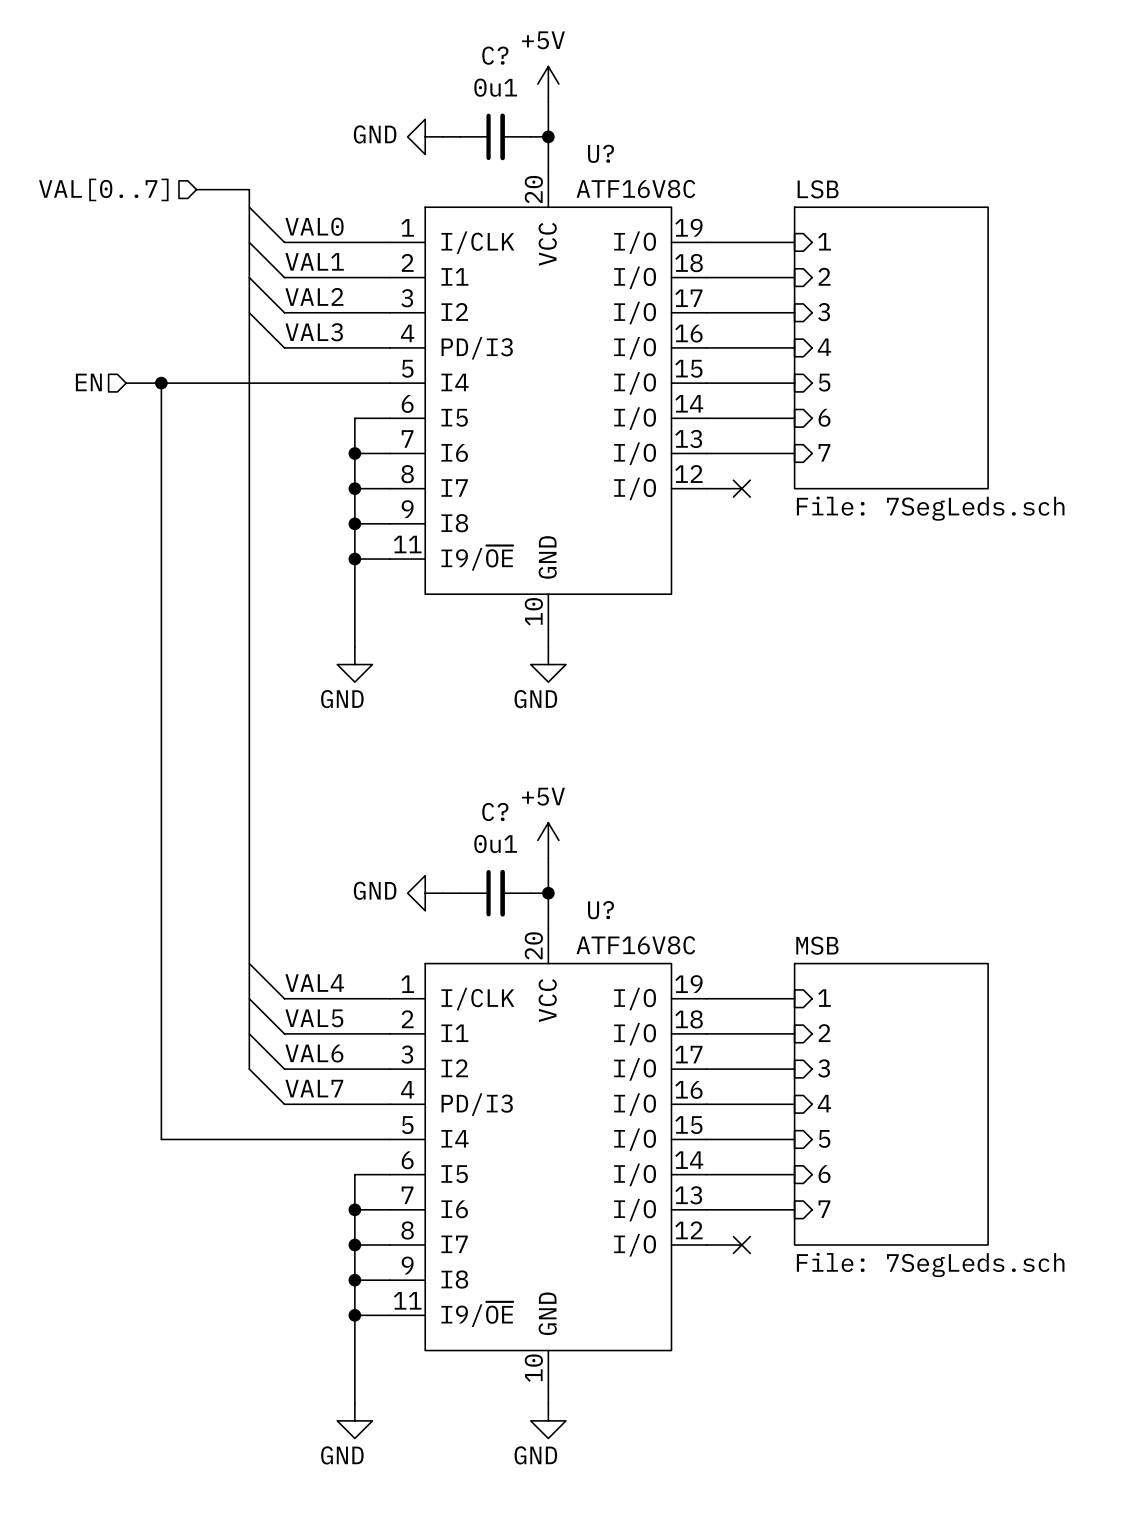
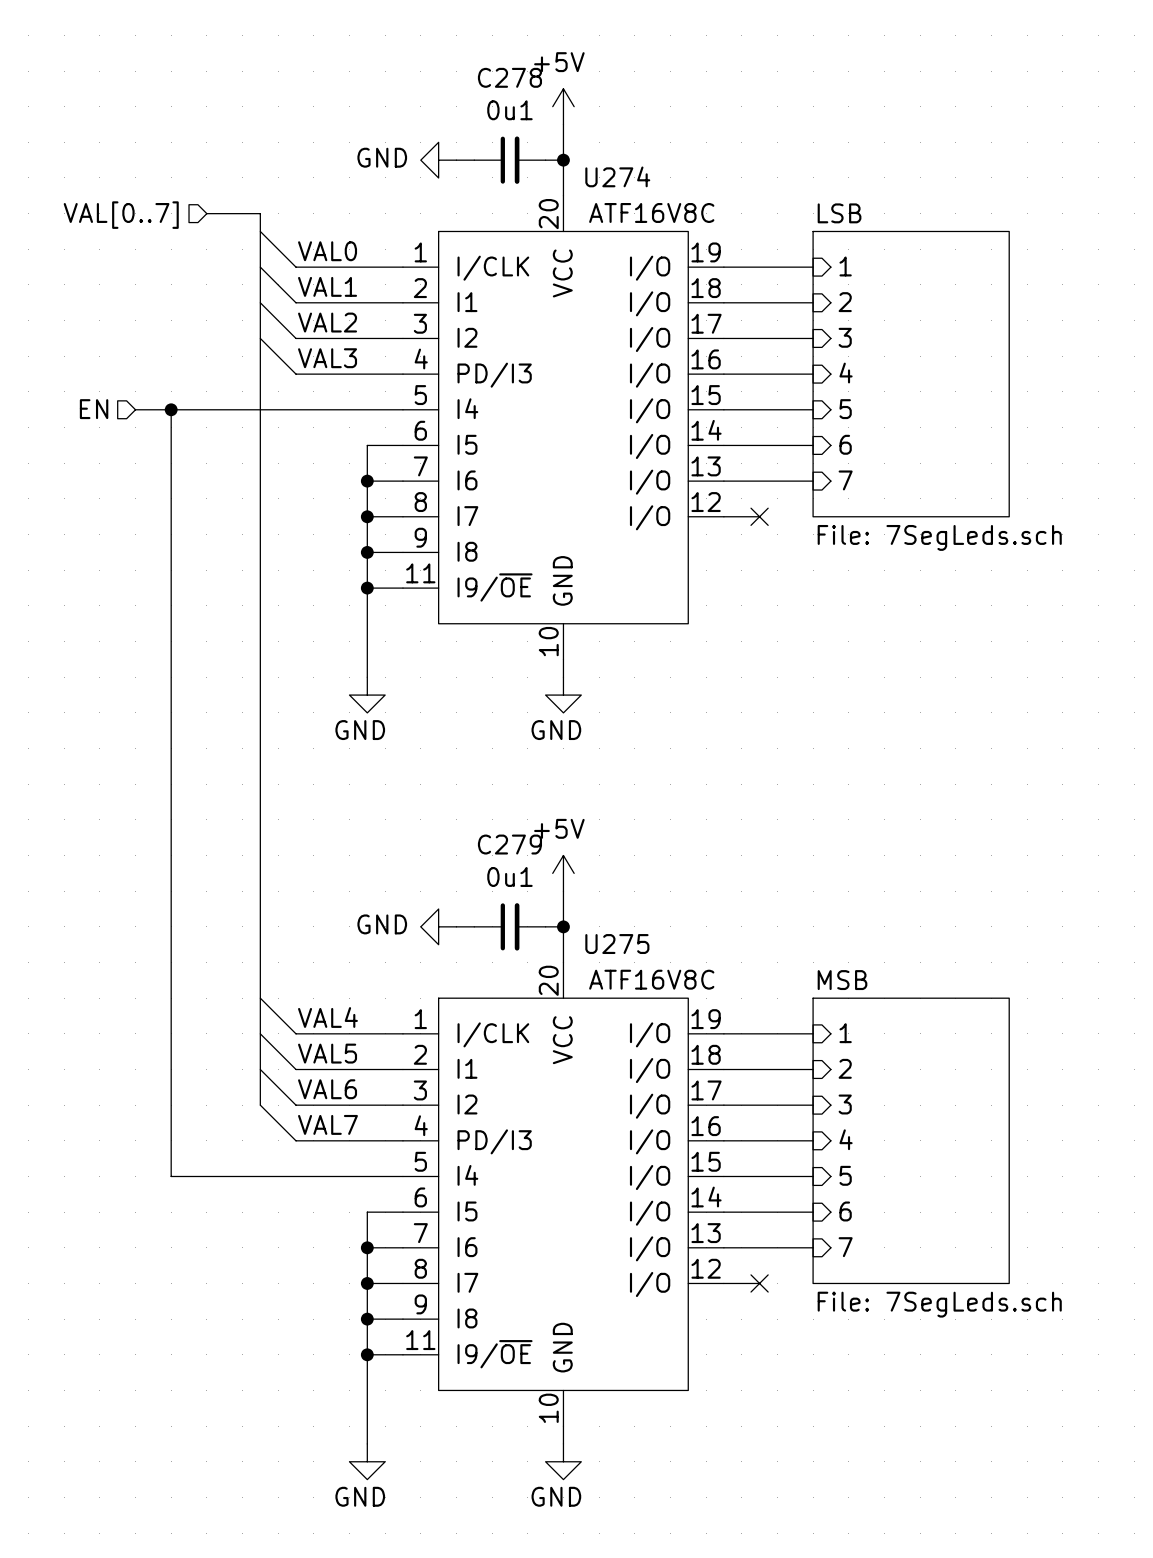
C? name: C? (495, 55) -> C278 (509, 77)
U? name: U? (600, 153) -> U274 (617, 176)
C? name: C? (495, 811) -> C279 (509, 844)
U? name: U? (600, 910) -> U275 (617, 944)

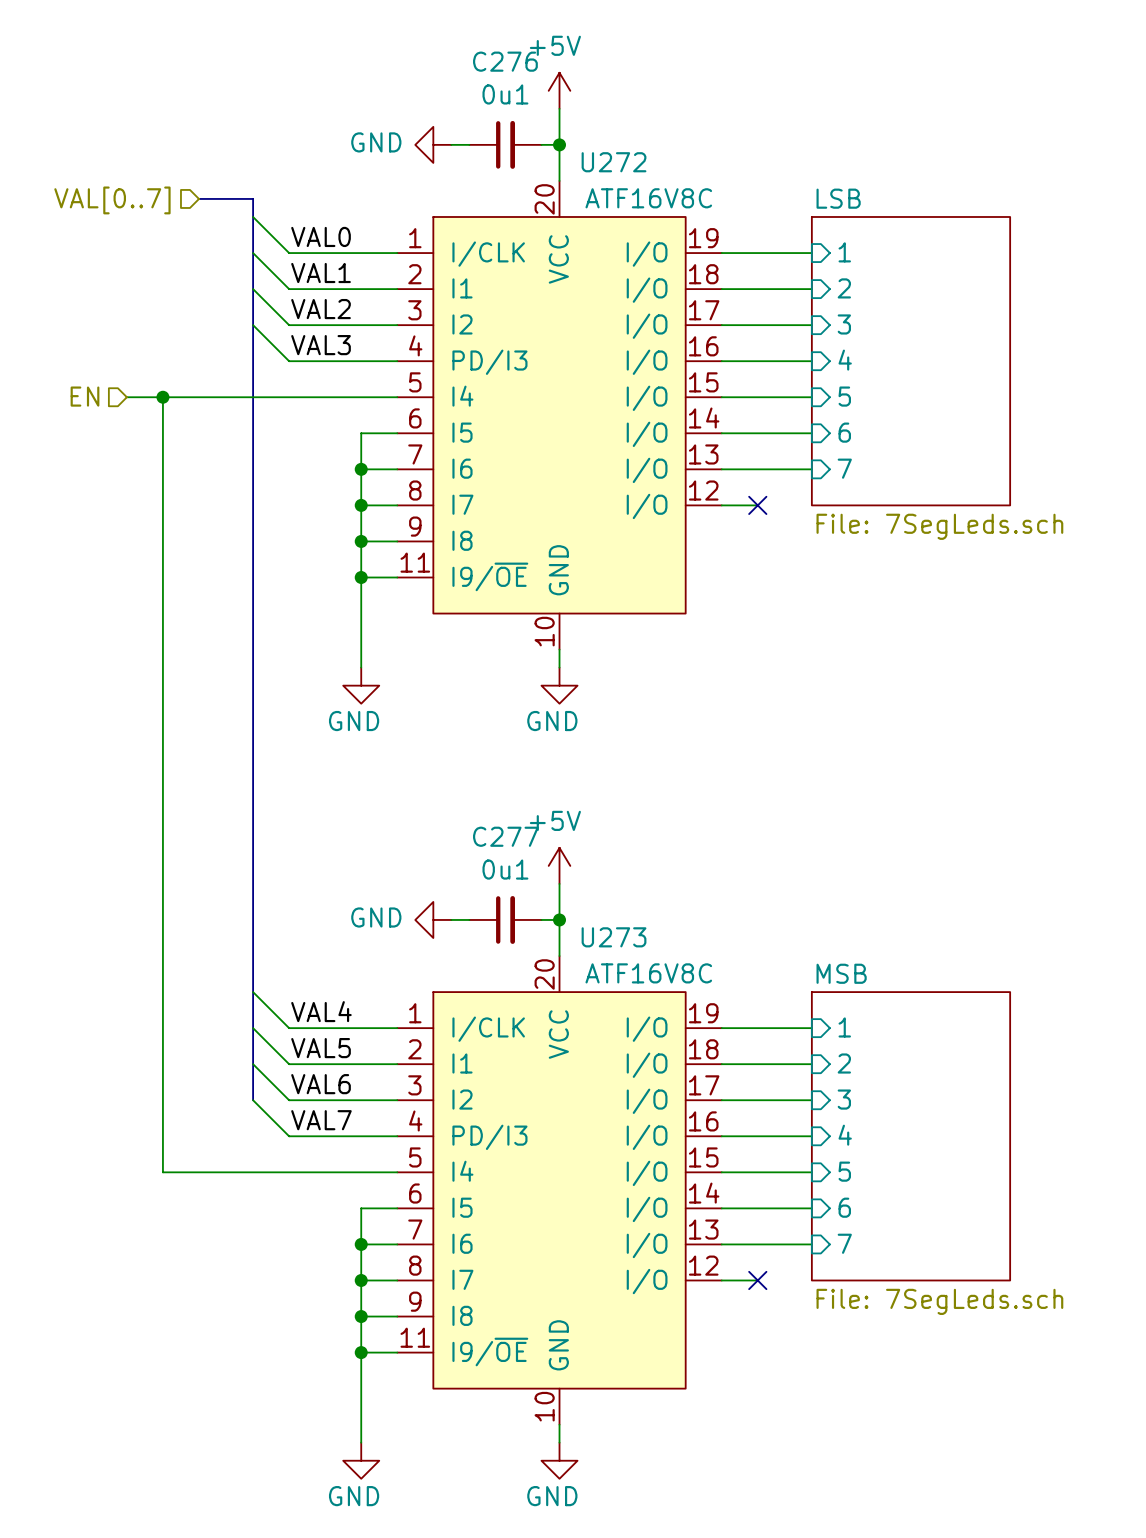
C278 name: C278 (509, 77) -> C276 (505, 61)
U274 name: U274 (617, 176) -> U272 (614, 162)
C279 name: C279 (509, 844) -> C277 (505, 836)
U275 name: U275 (617, 944) -> U273 (614, 937)

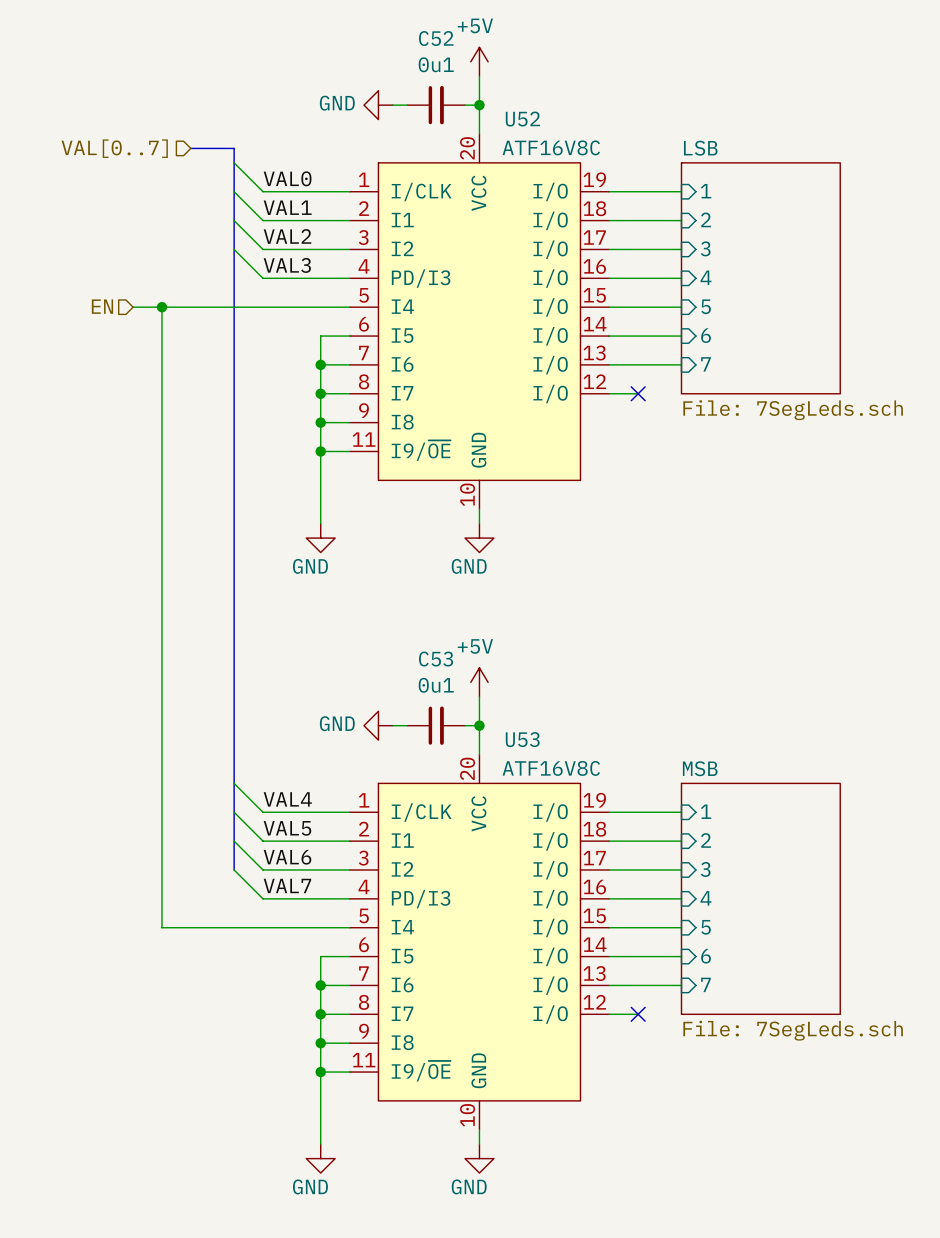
C276 name: C276 (505, 61) -> C52 (436, 38)
U272 name: U272 (614, 162) -> U52 (522, 119)
C277 name: C277 (505, 836) -> C53 (436, 659)
U273 name: U273 (614, 937) -> U53 (522, 739)

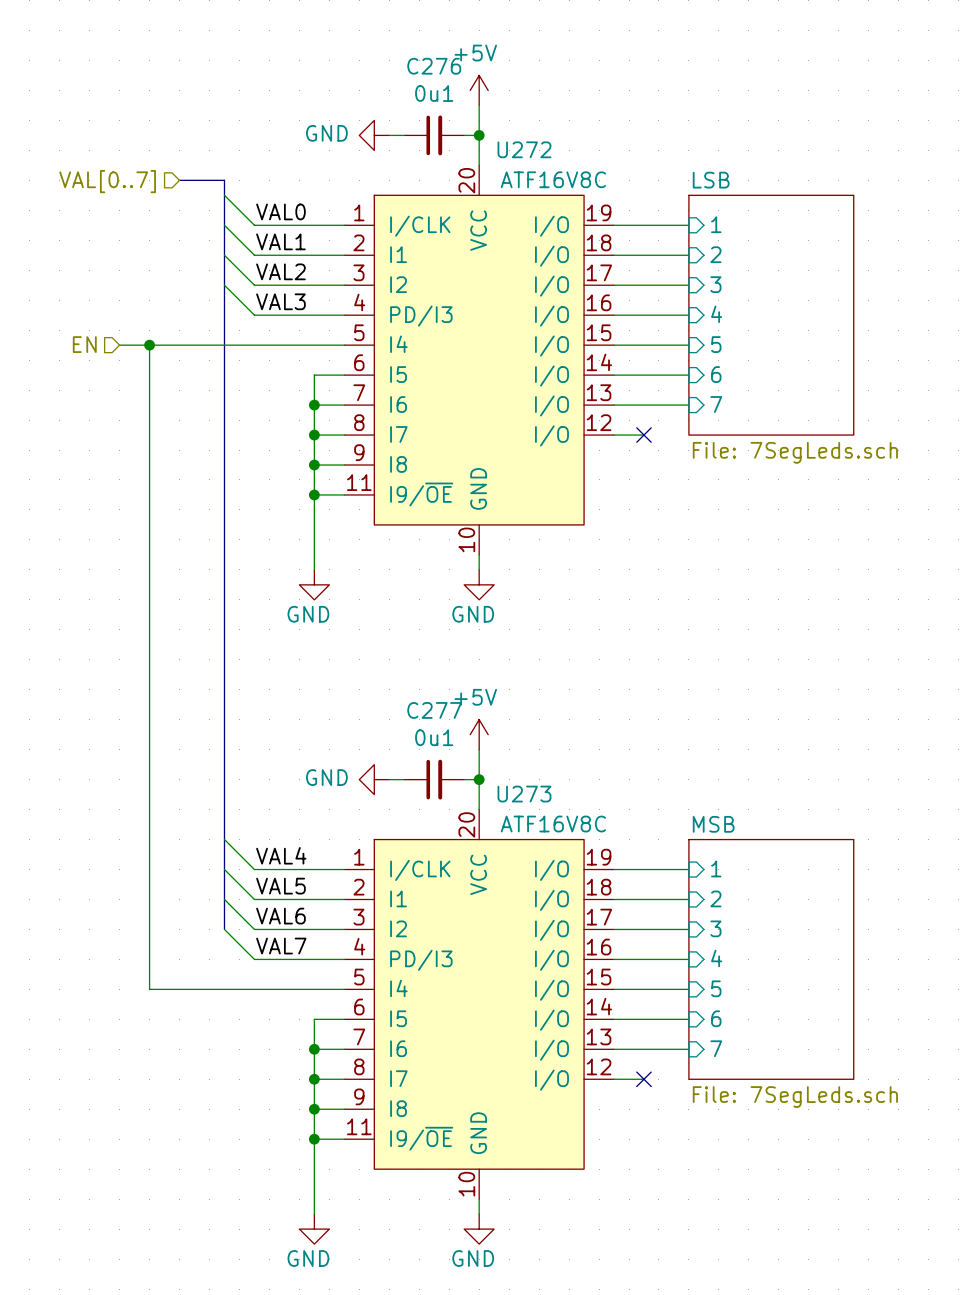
C52 name: C52 (436, 38) -> C276 (434, 66)
U52 name: U52 (522, 119) -> U272 (524, 149)
C53 name: C53 (436, 659) -> C277 (434, 710)
U53 name: U53 (522, 739) -> U273 (524, 794)

